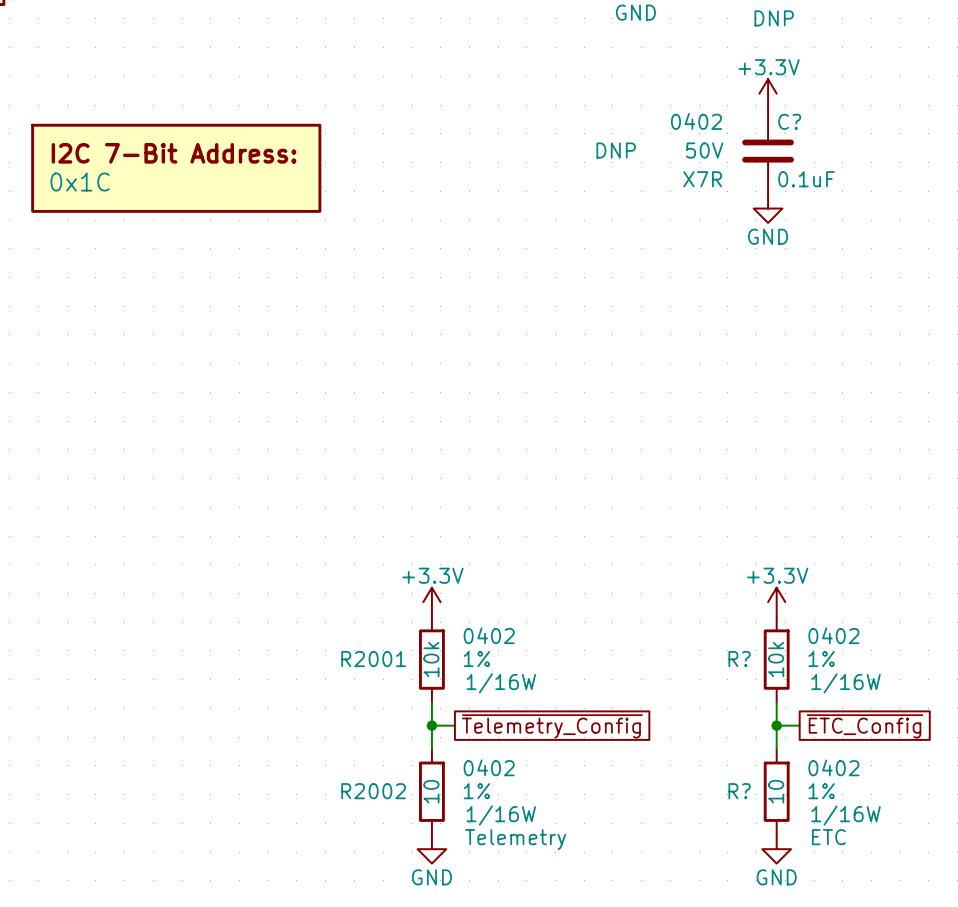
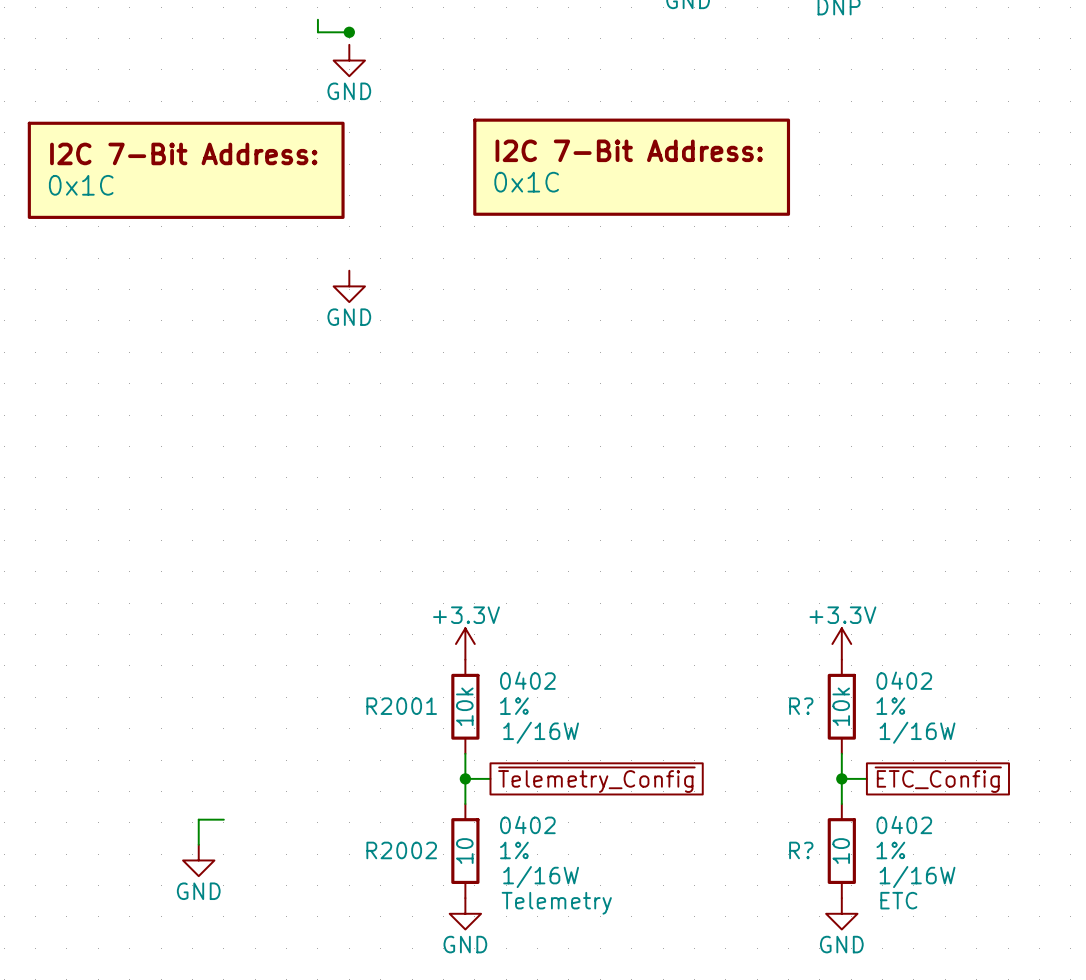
wire: none -> (317, 19) (317, 32) (349, 32)
junction: none -> (349, 32)
power symbol: none -> GND (349, 60)
power symbol: +3.3V (768, 93) -> none
C?: 0.1uF (768, 151) -> none
part: none -> 0x1C (631, 167)
power symbol: GND (768, 208) -> none
power symbol: none -> GND (349, 286)
wire: none -> (223, 819) (198, 819) (198, 844)
power symbol: none -> GND (198, 860)

